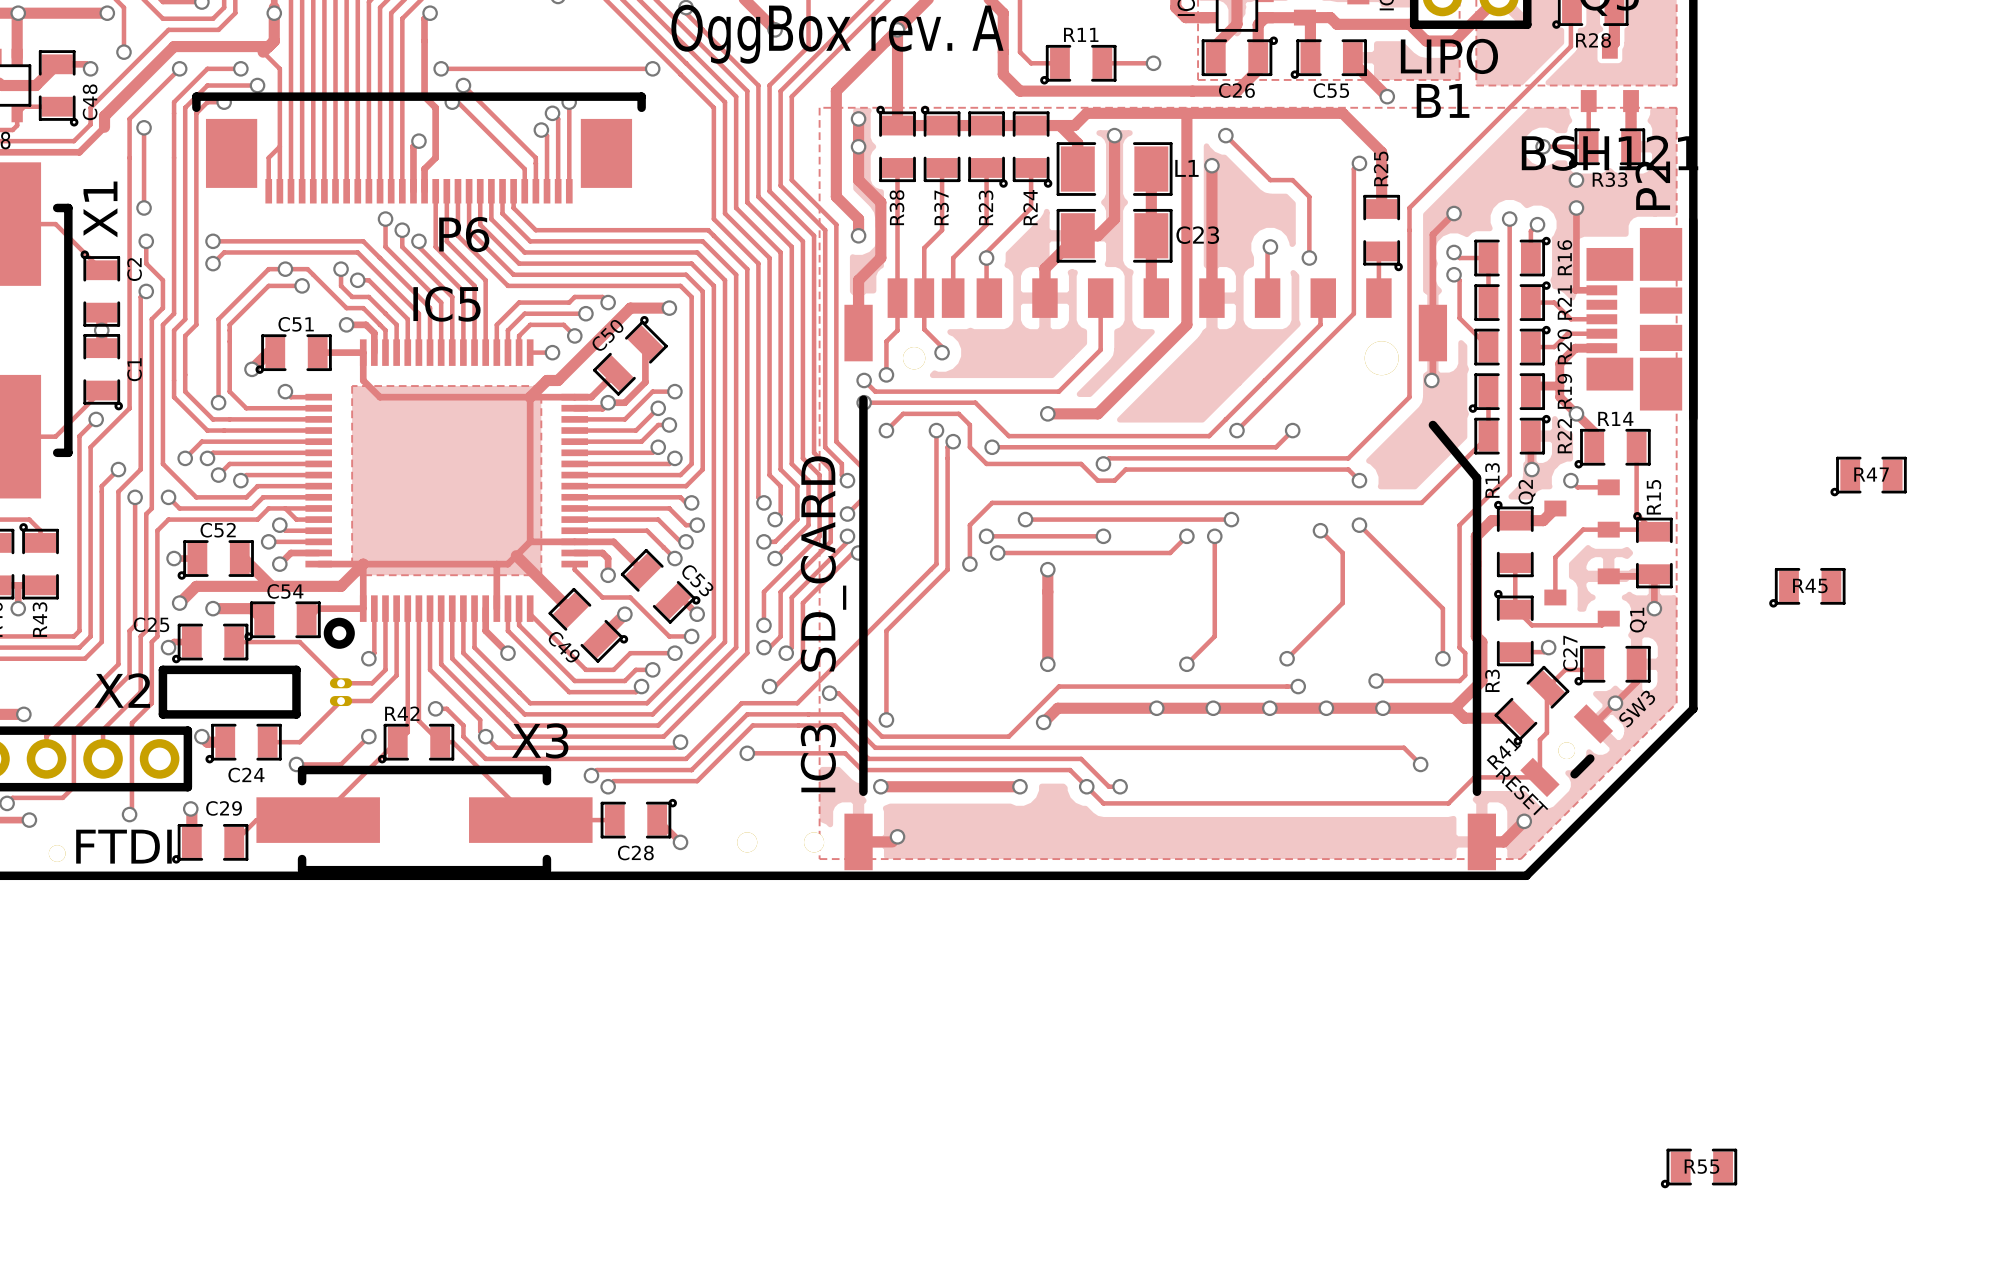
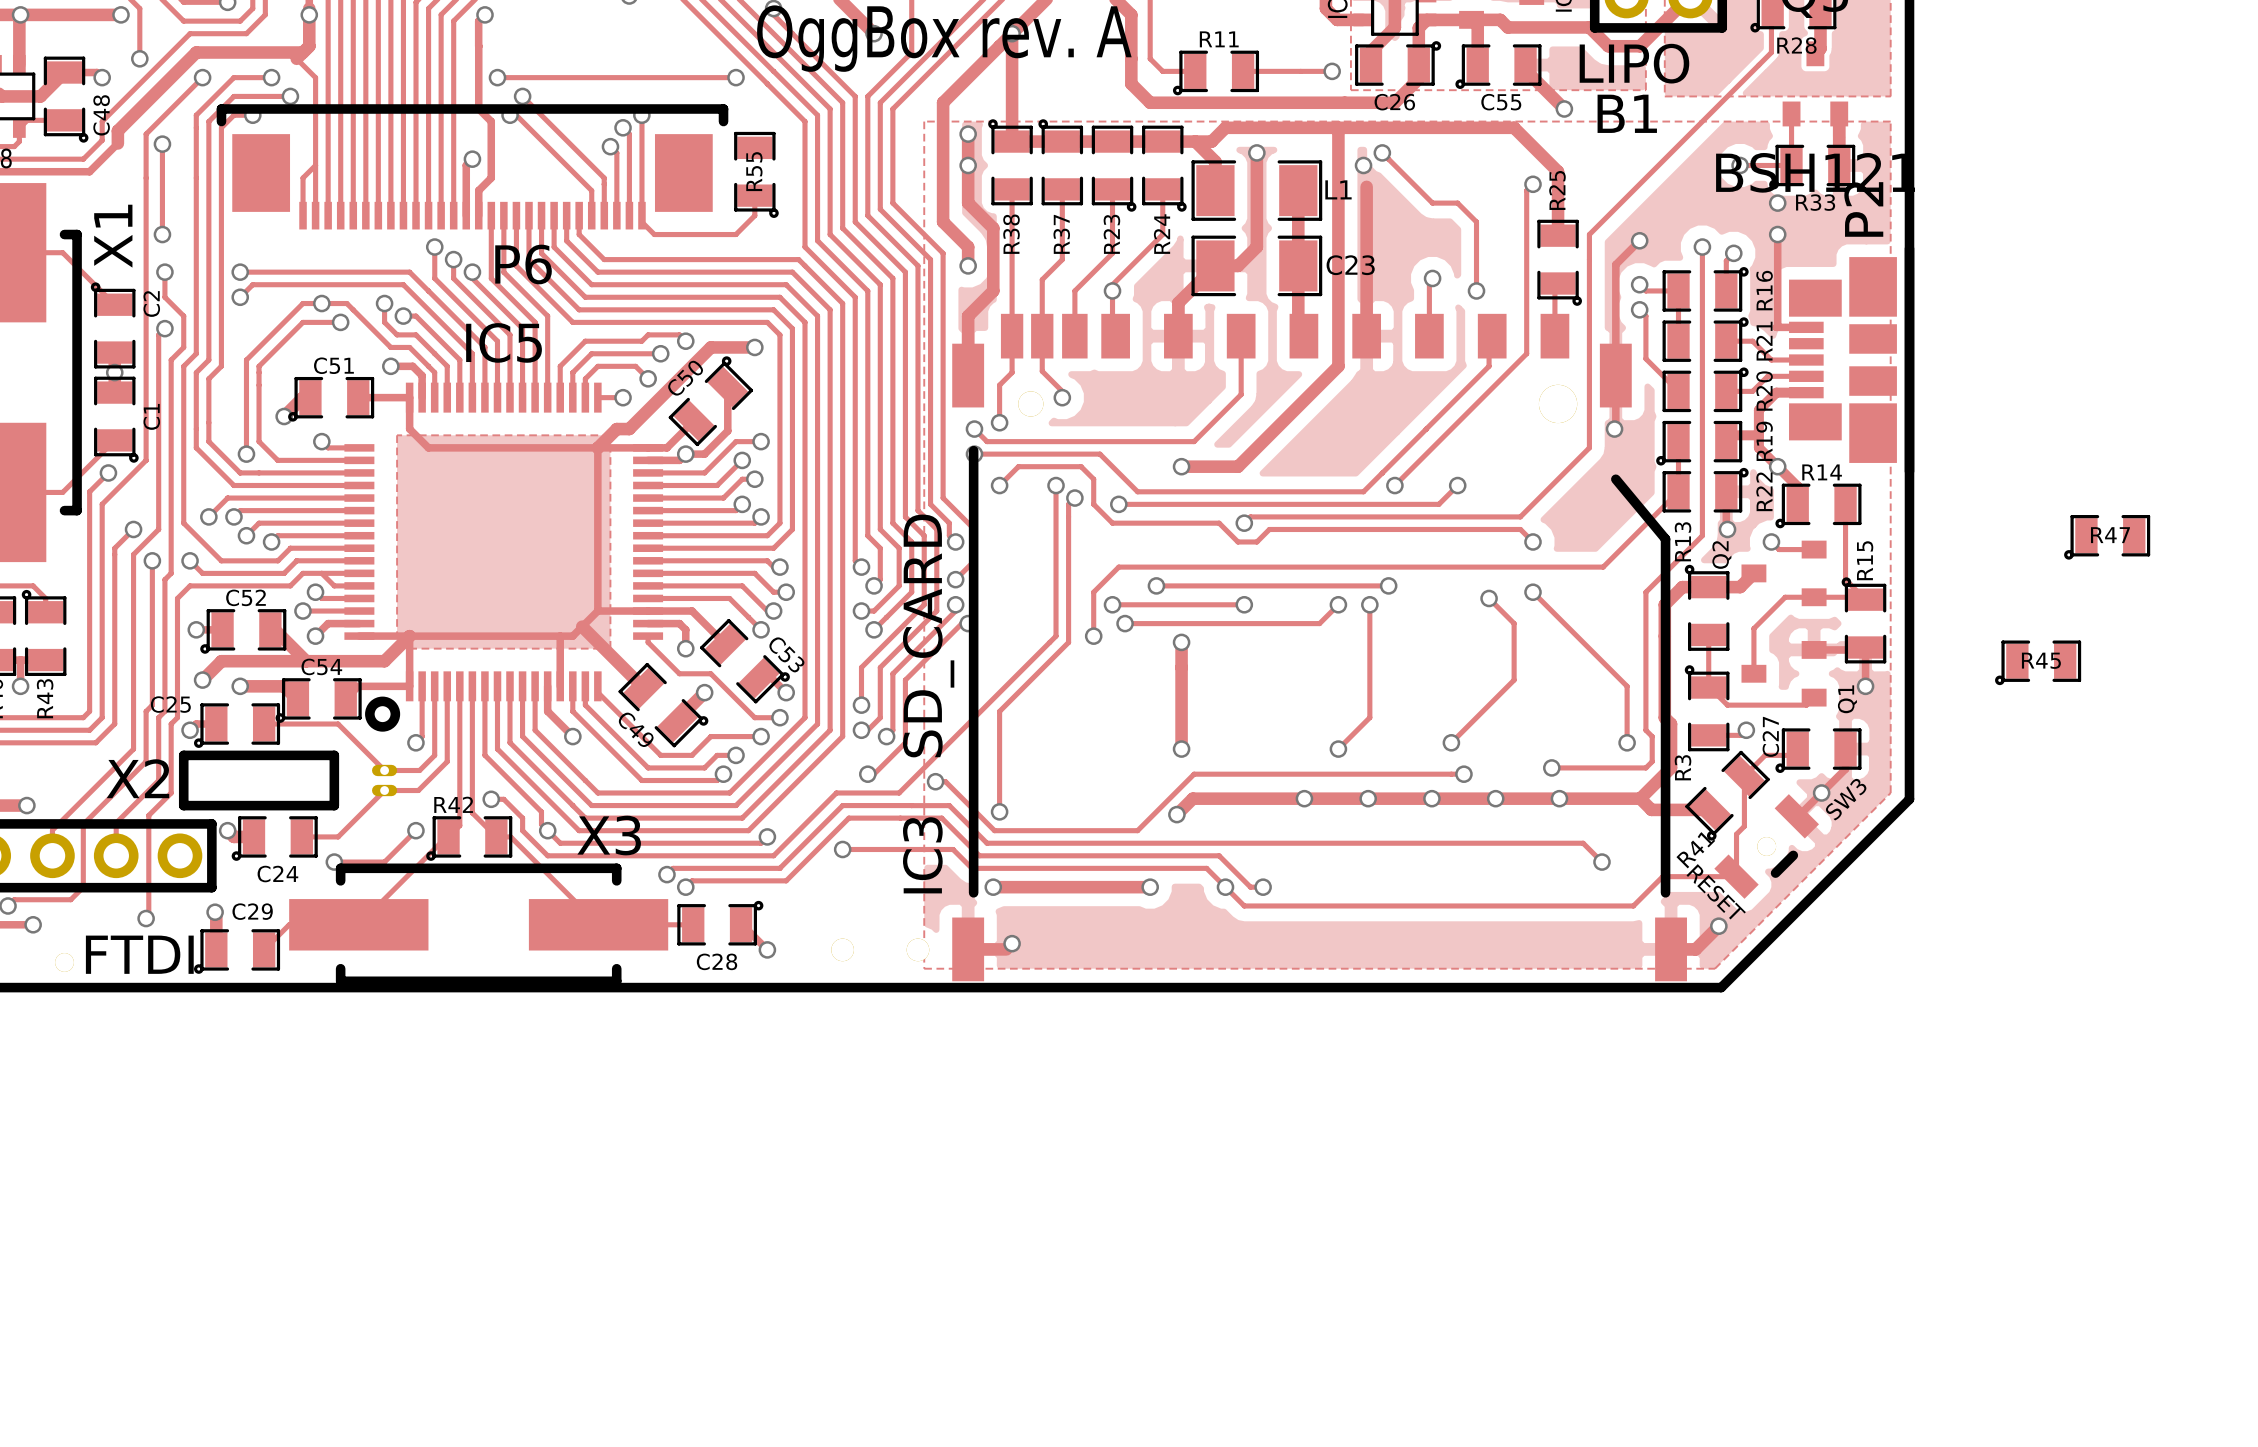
track: none -> (1300, 71) (1332, 71)
via position: (1153, 63) -> (1332, 71)
via position: (1211, 165) -> (1363, 165)
track: none -> (754, 195) (754, 215) (735, 234) (654, 234) (641, 222) (641, 215)
R55 rotation: 0° (1699, 1168) -> 90° counterclockwise (756, 174)
R55 position: (1699, 1168) -> (756, 174)

